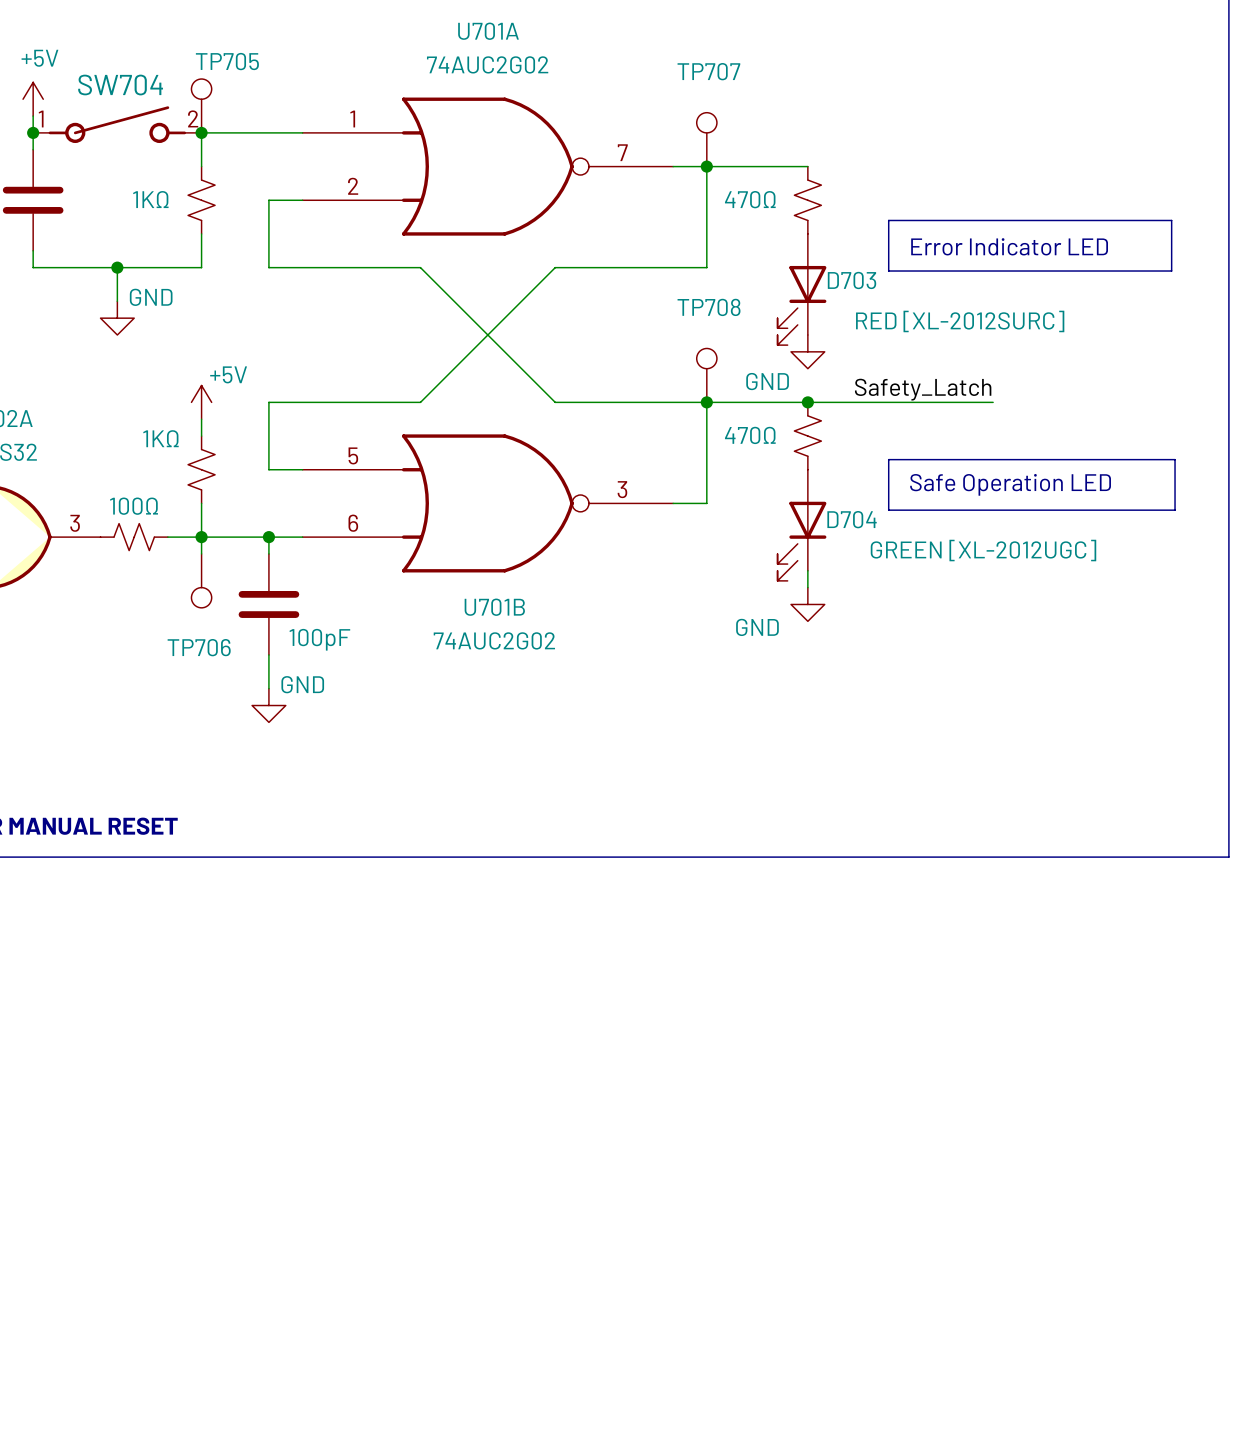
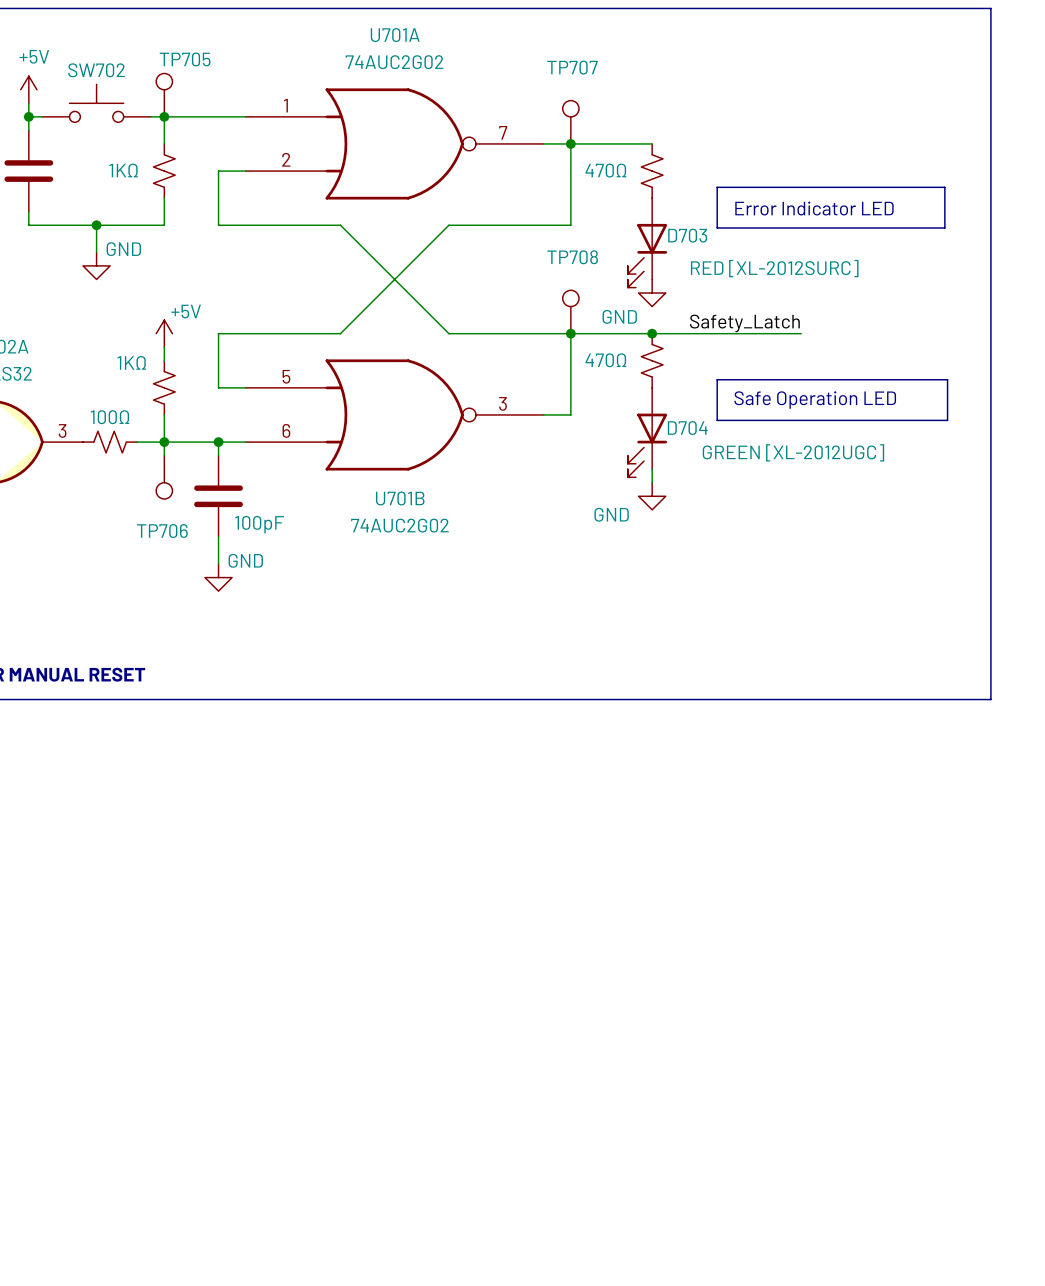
SW702: none -> (96, 103)
SW704: (117, 124) -> none

